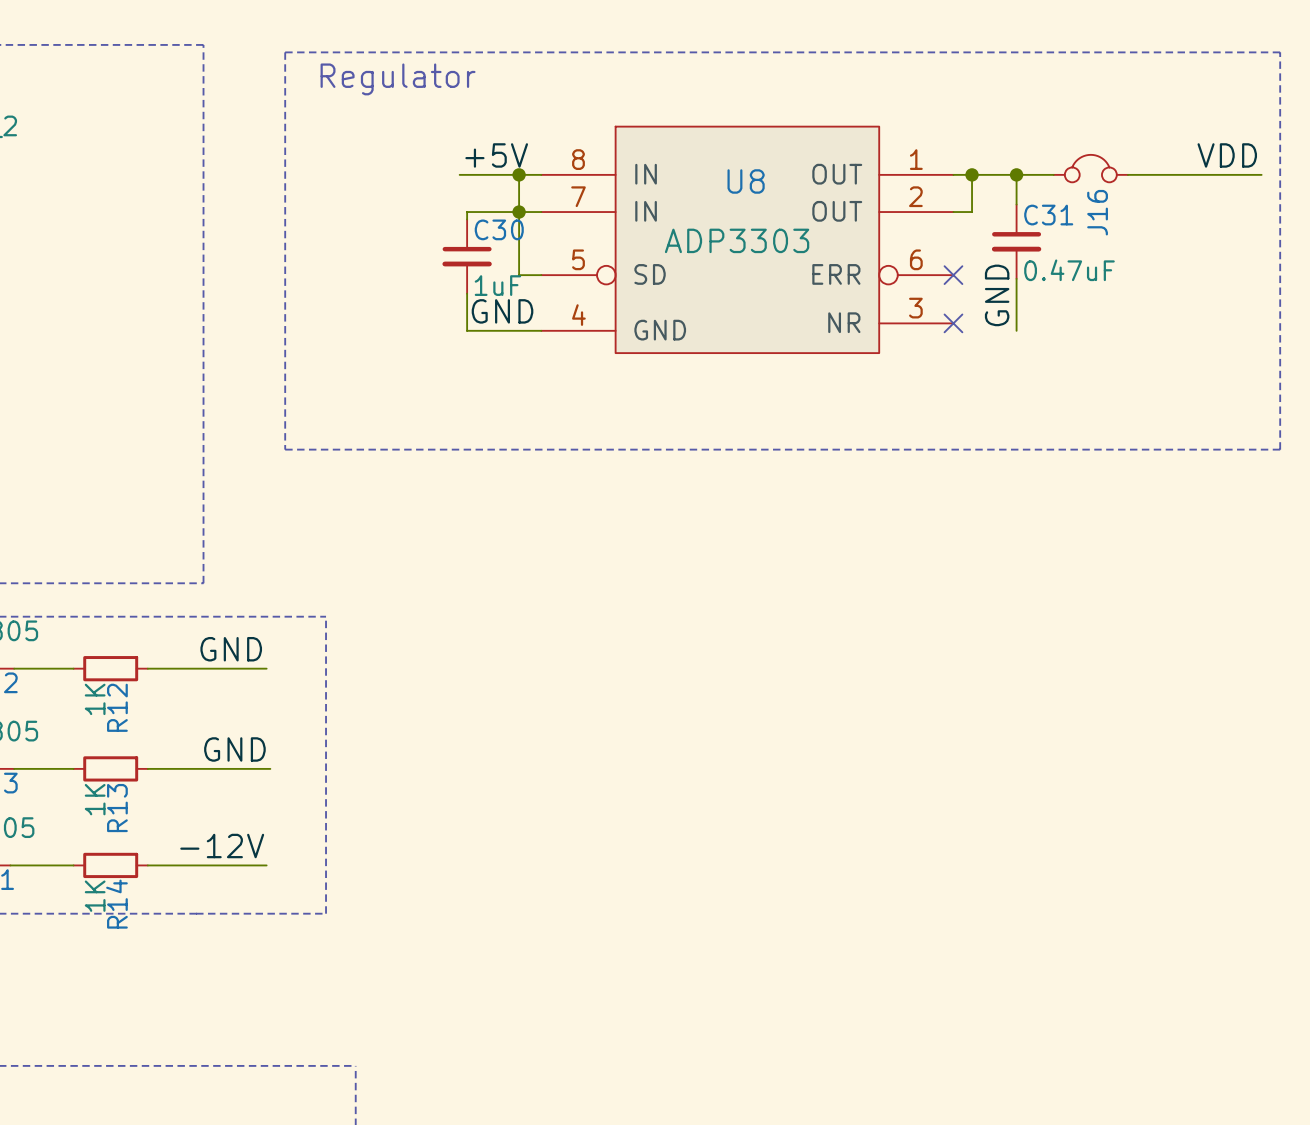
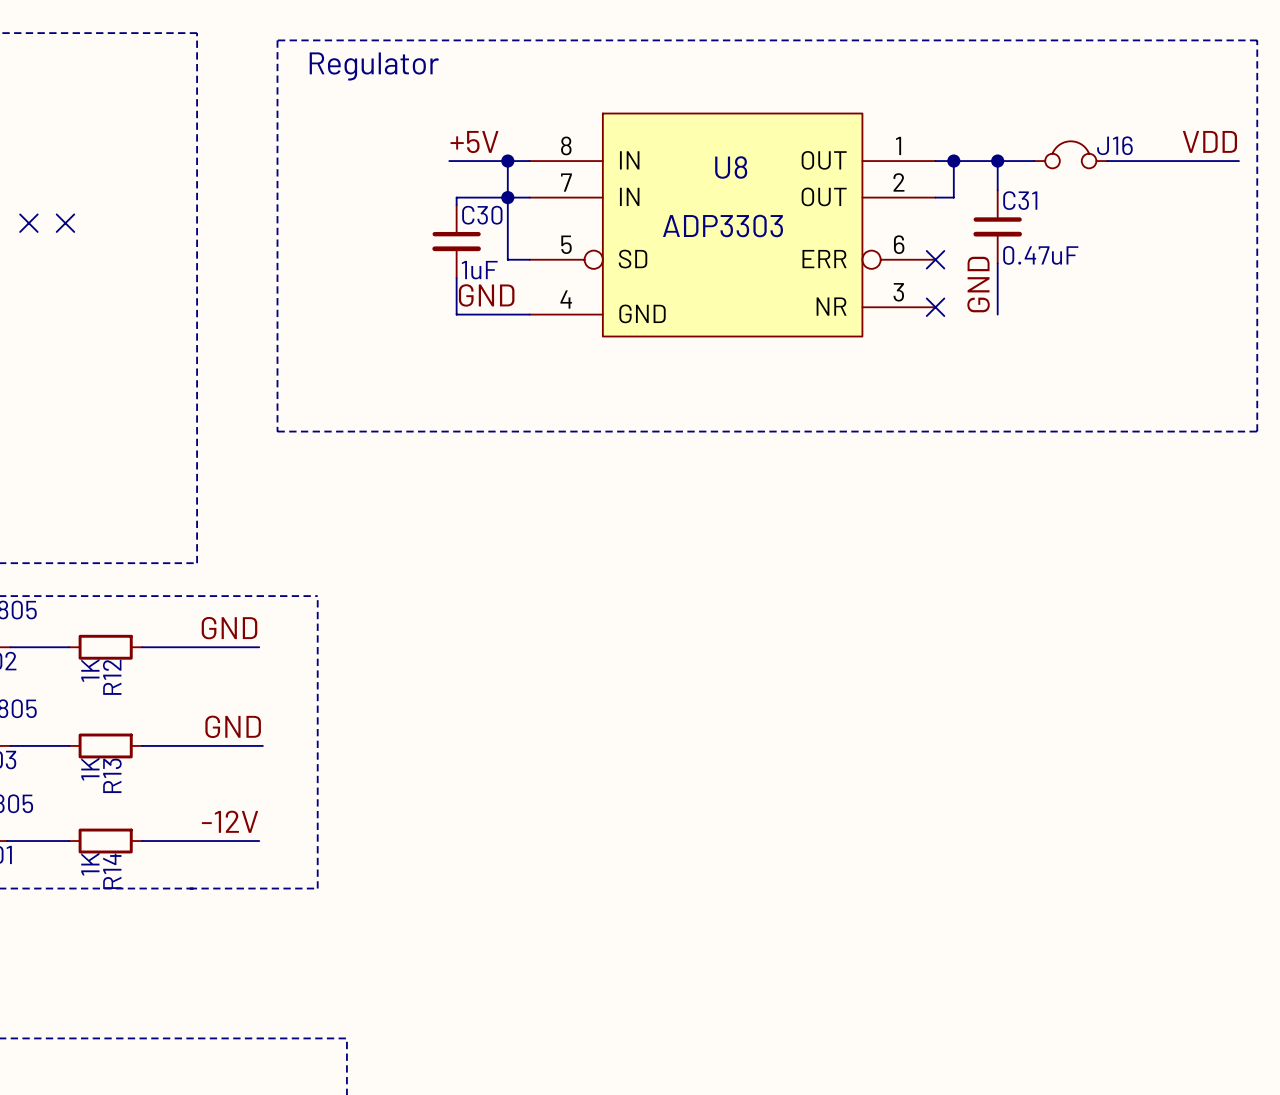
J16 name rotation: 0° (1097, 212) -> 90° clockwise (1114, 145)
J16 name position: J16 (1097, 212) -> J16 (1114, 145)
no-connect mark: none -> (28, 223)
no-connect mark: none -> (65, 223)

